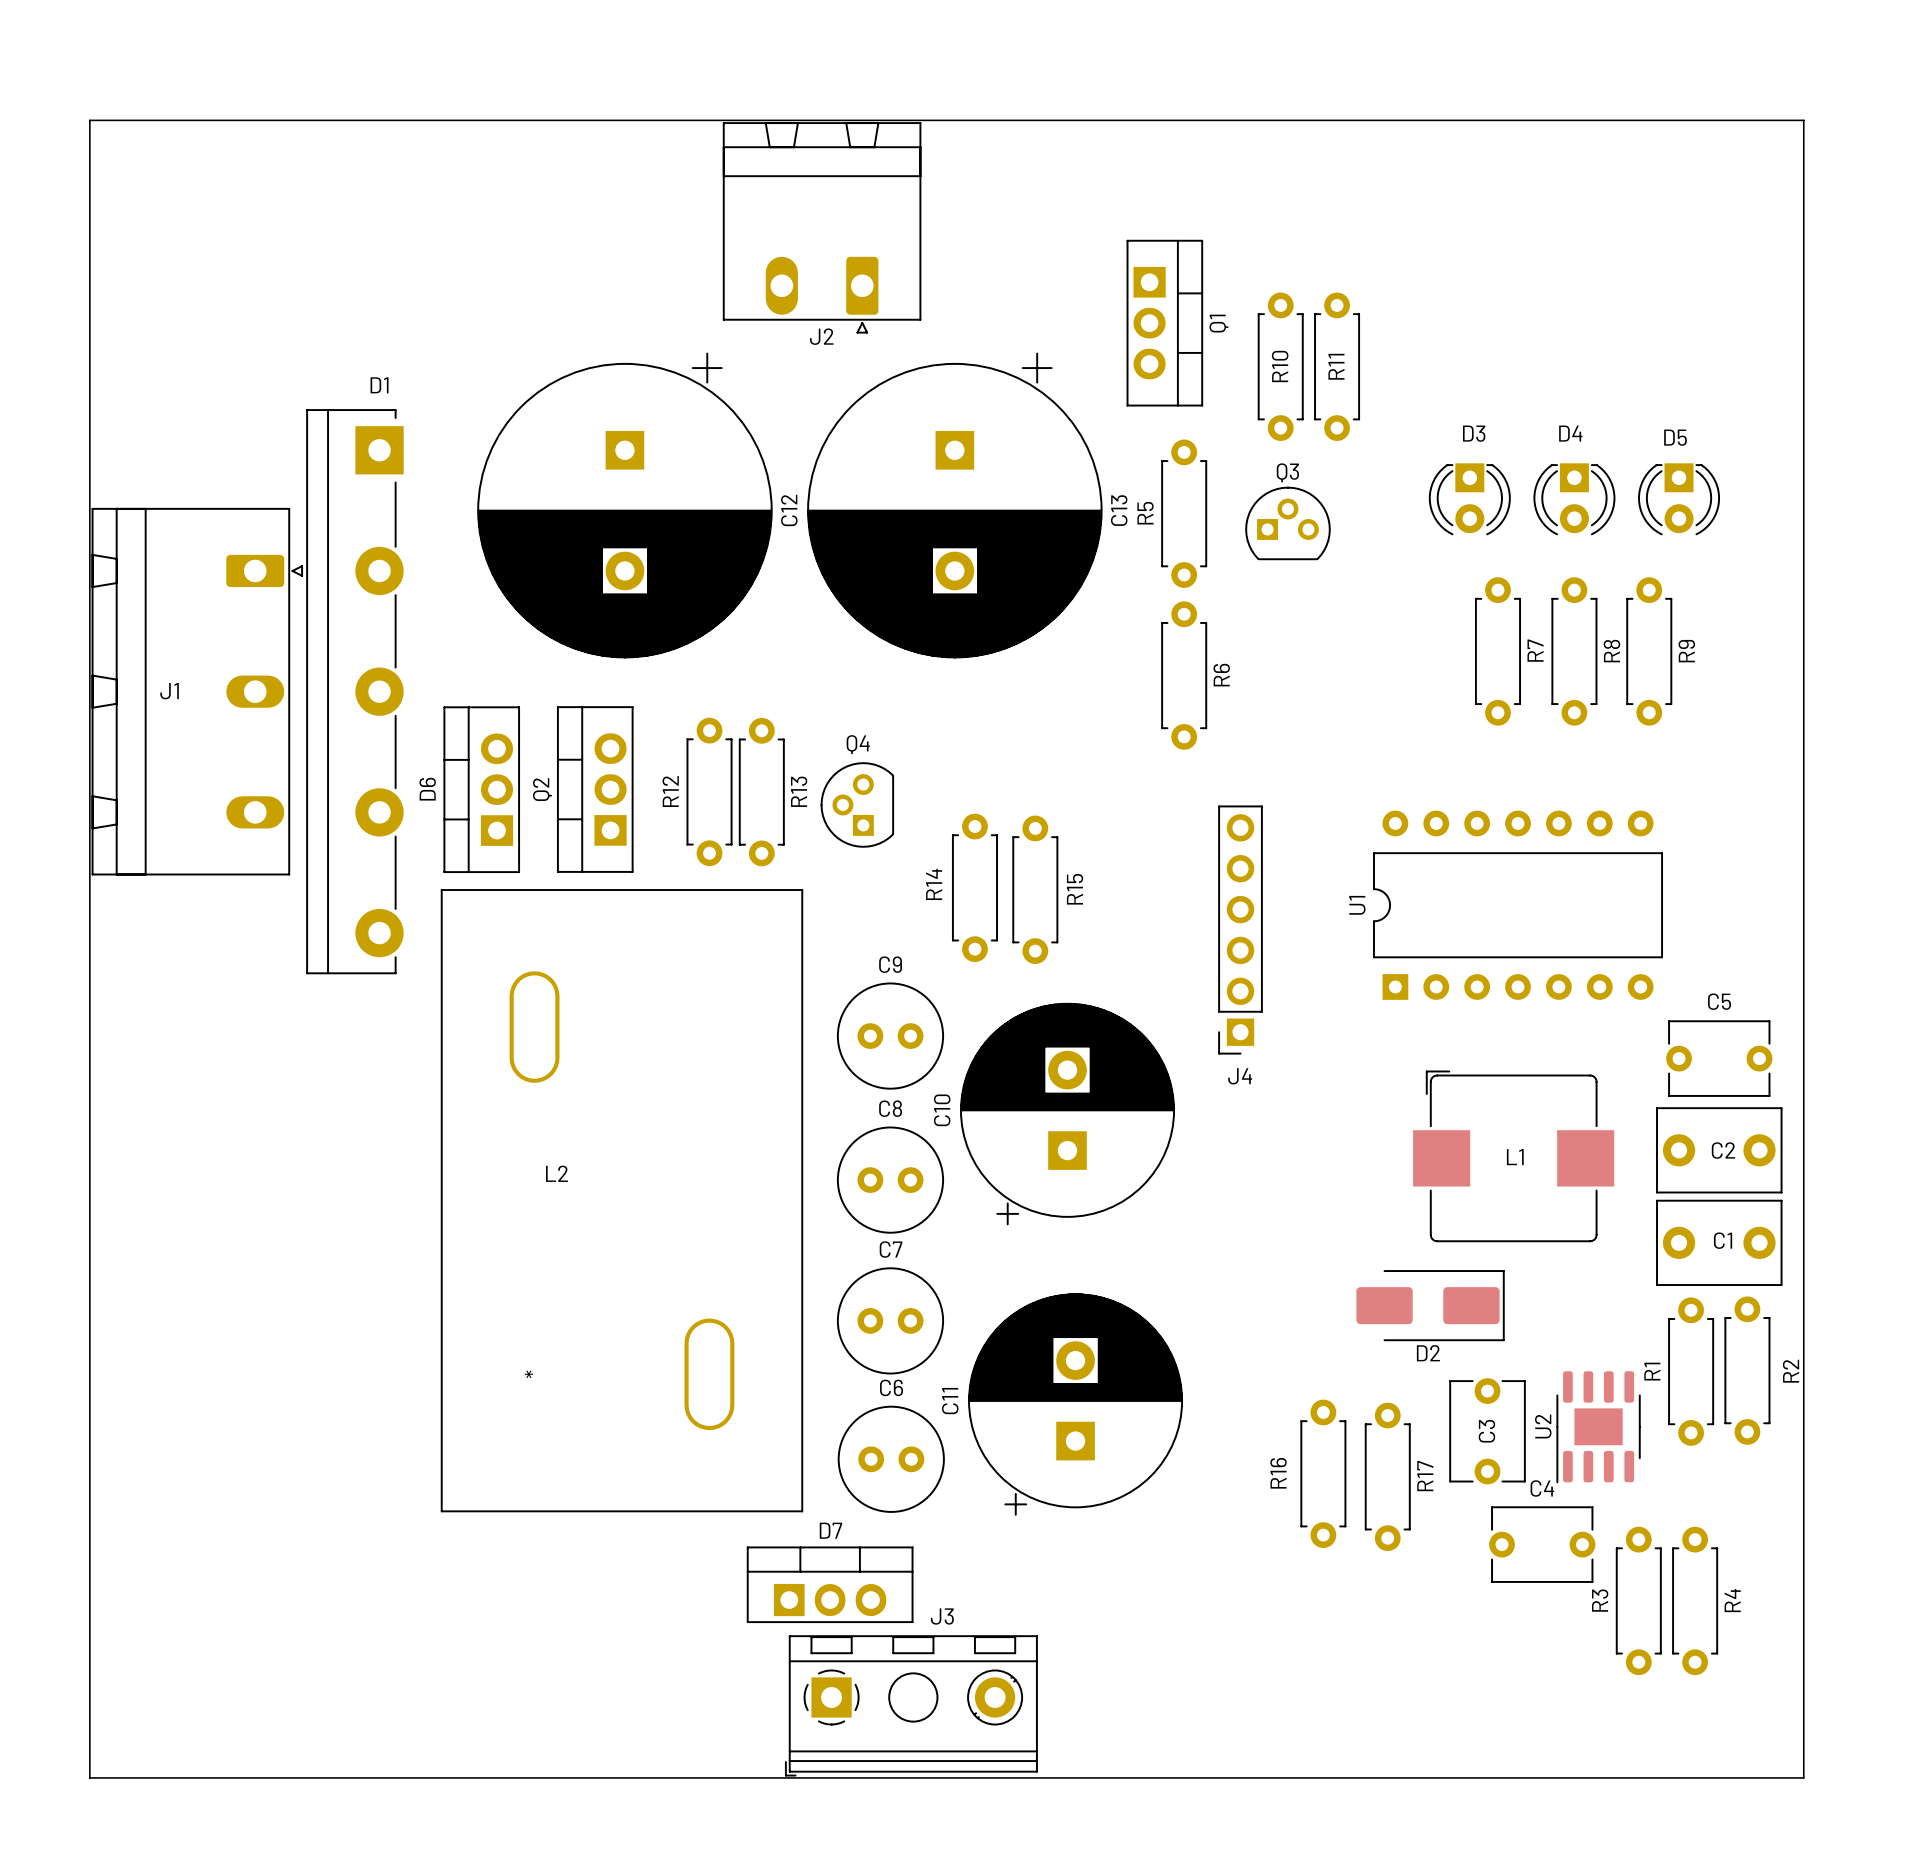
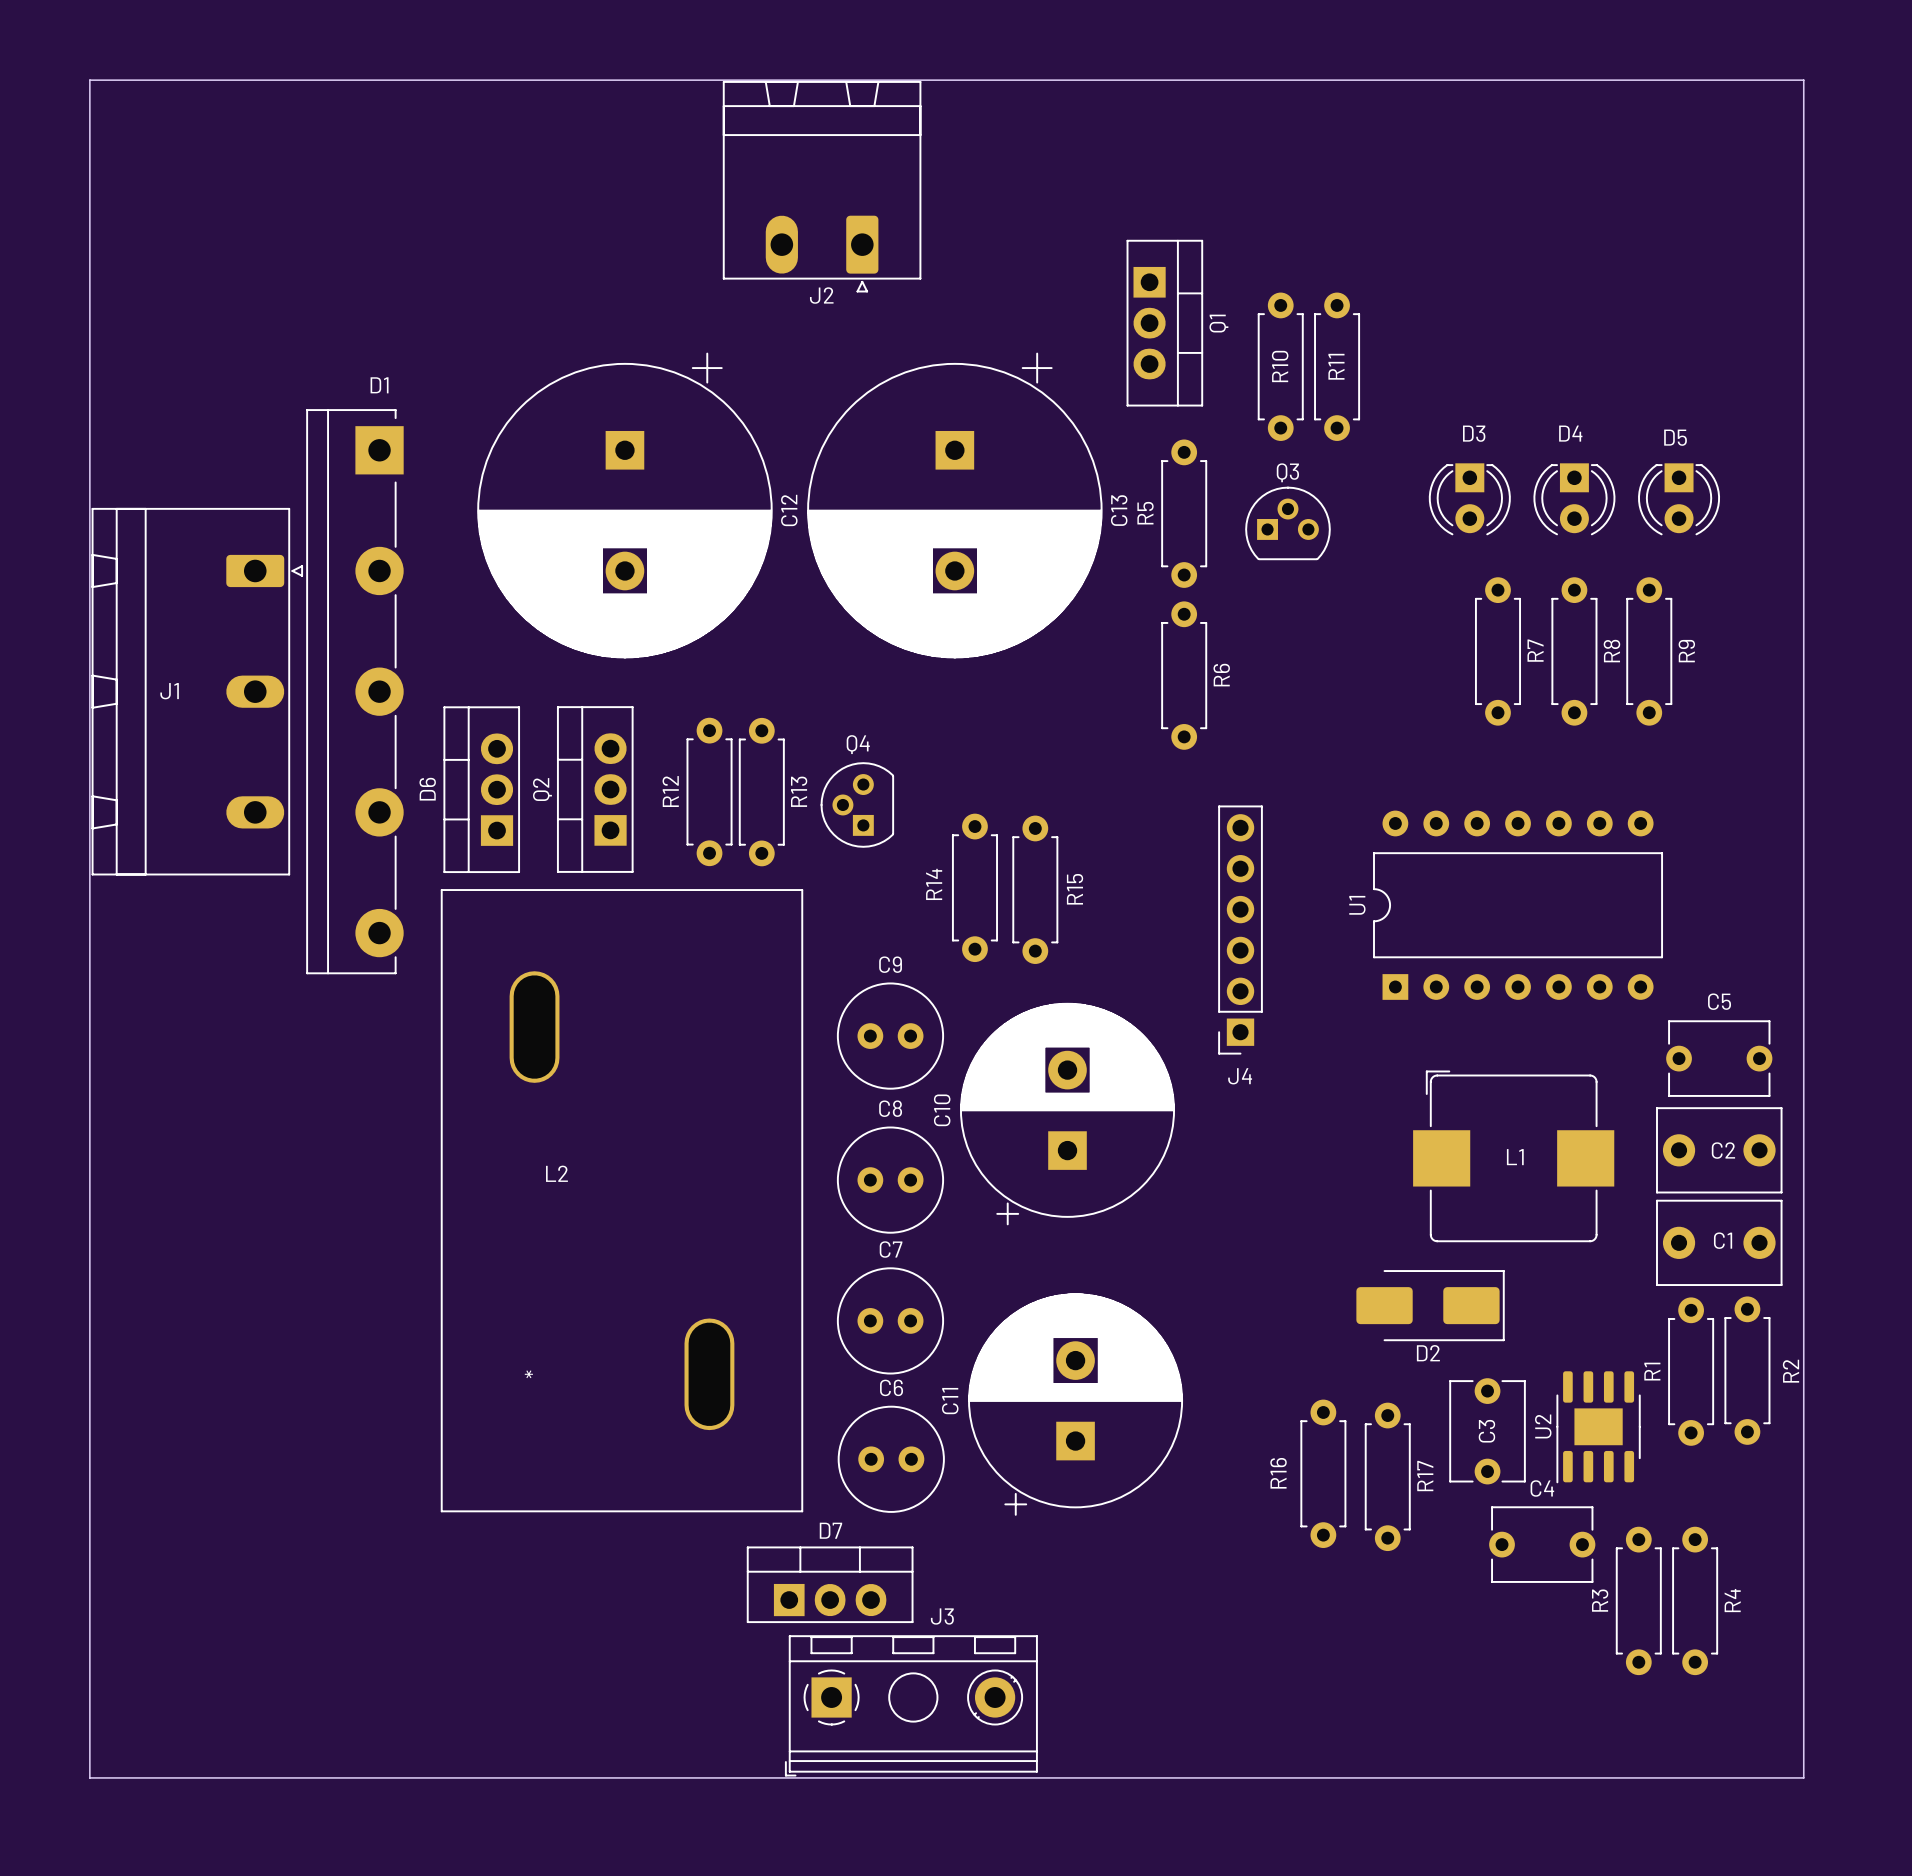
board edge: (89, 120) (1803, 120) -> (89, 120) (89, 80) (1803, 80) (1803, 120)
J2 position: (822, 227) -> (822, 186)

